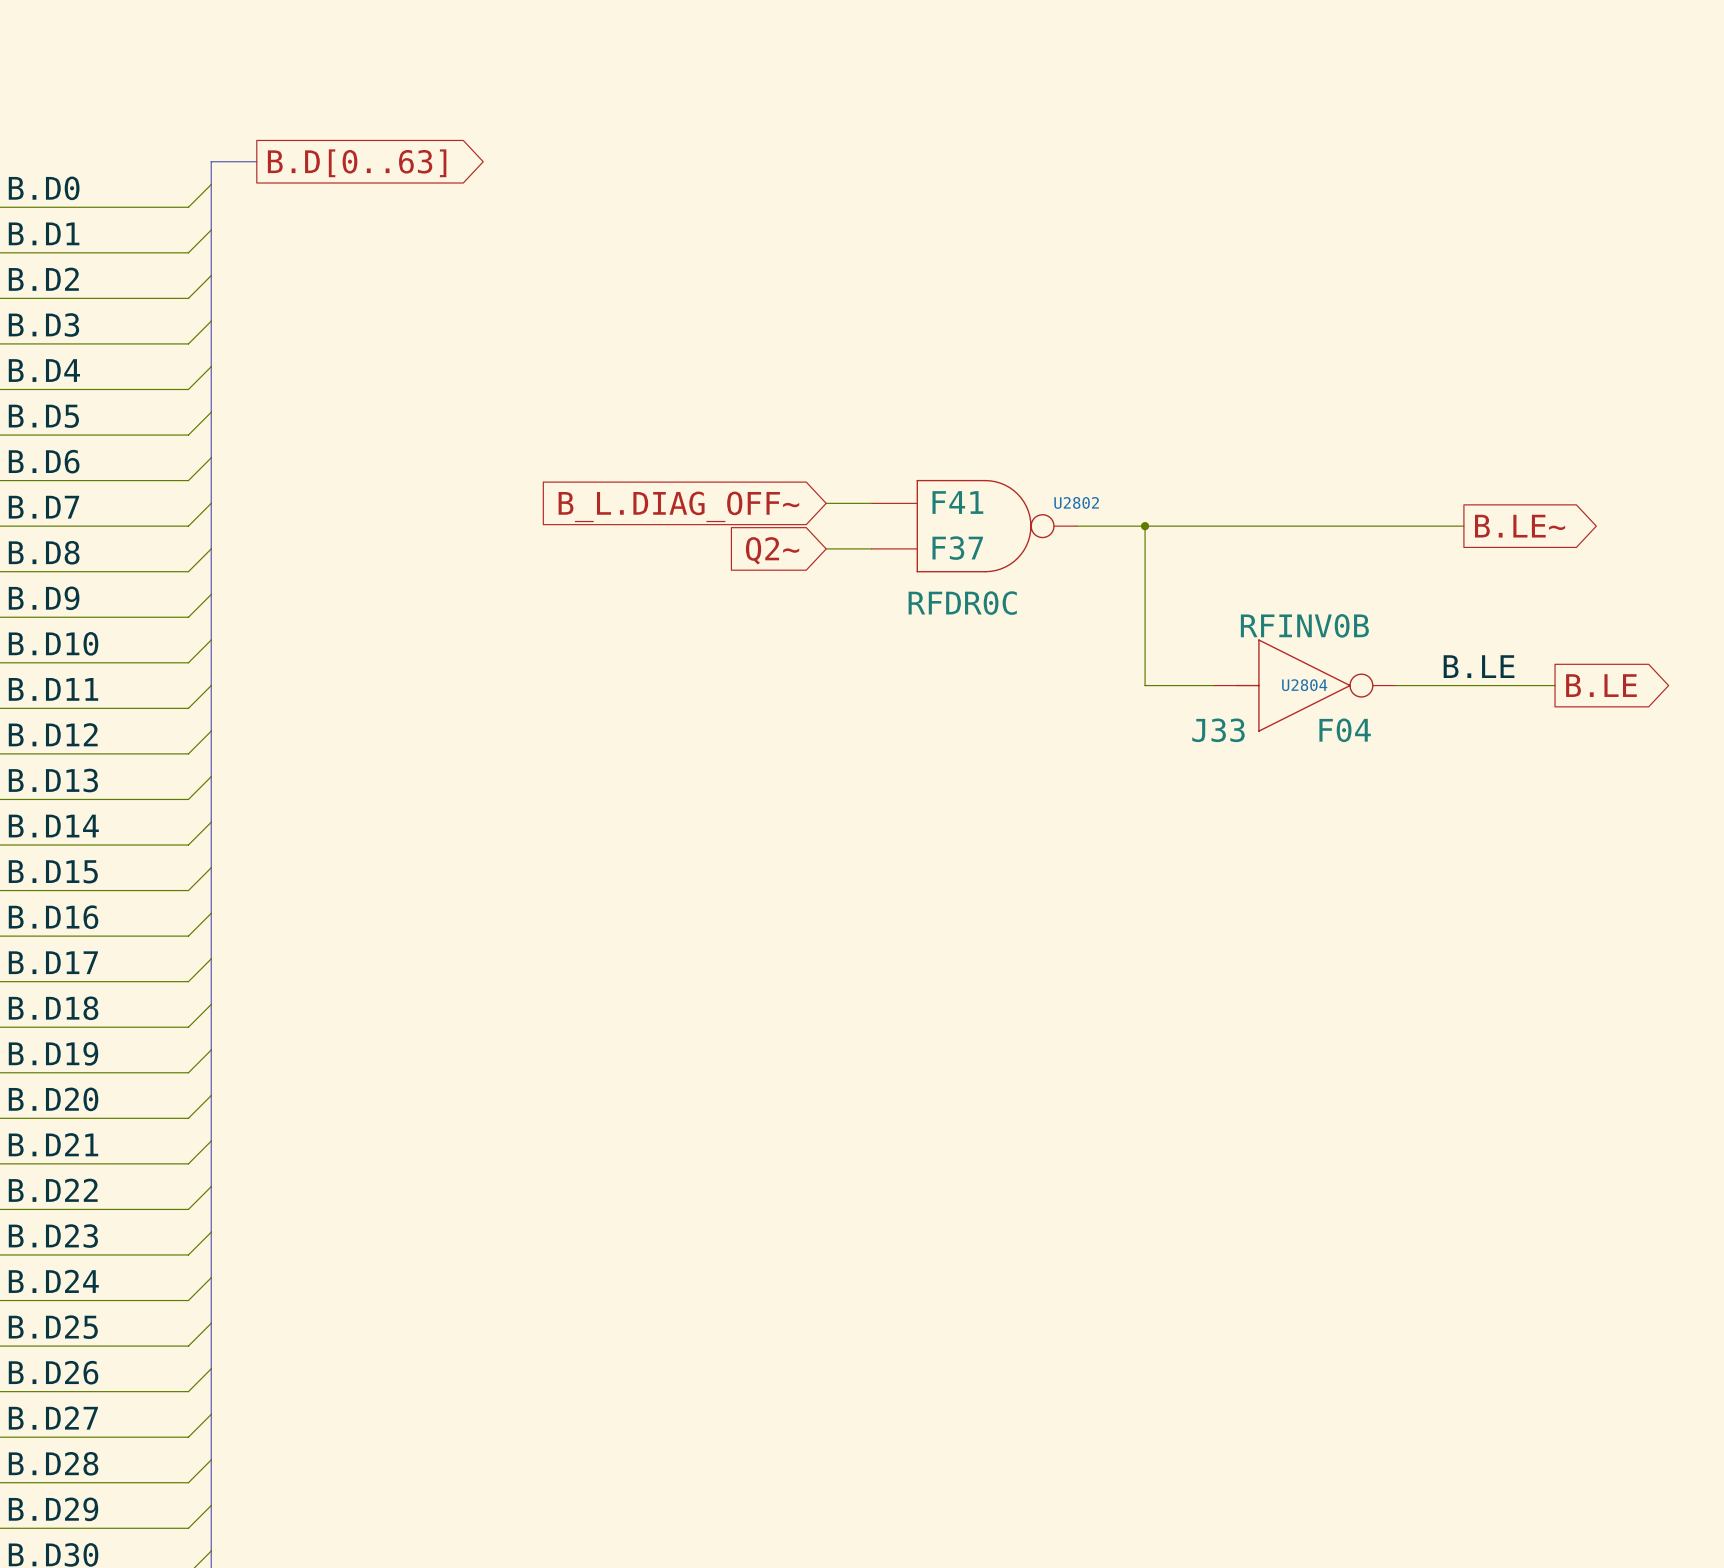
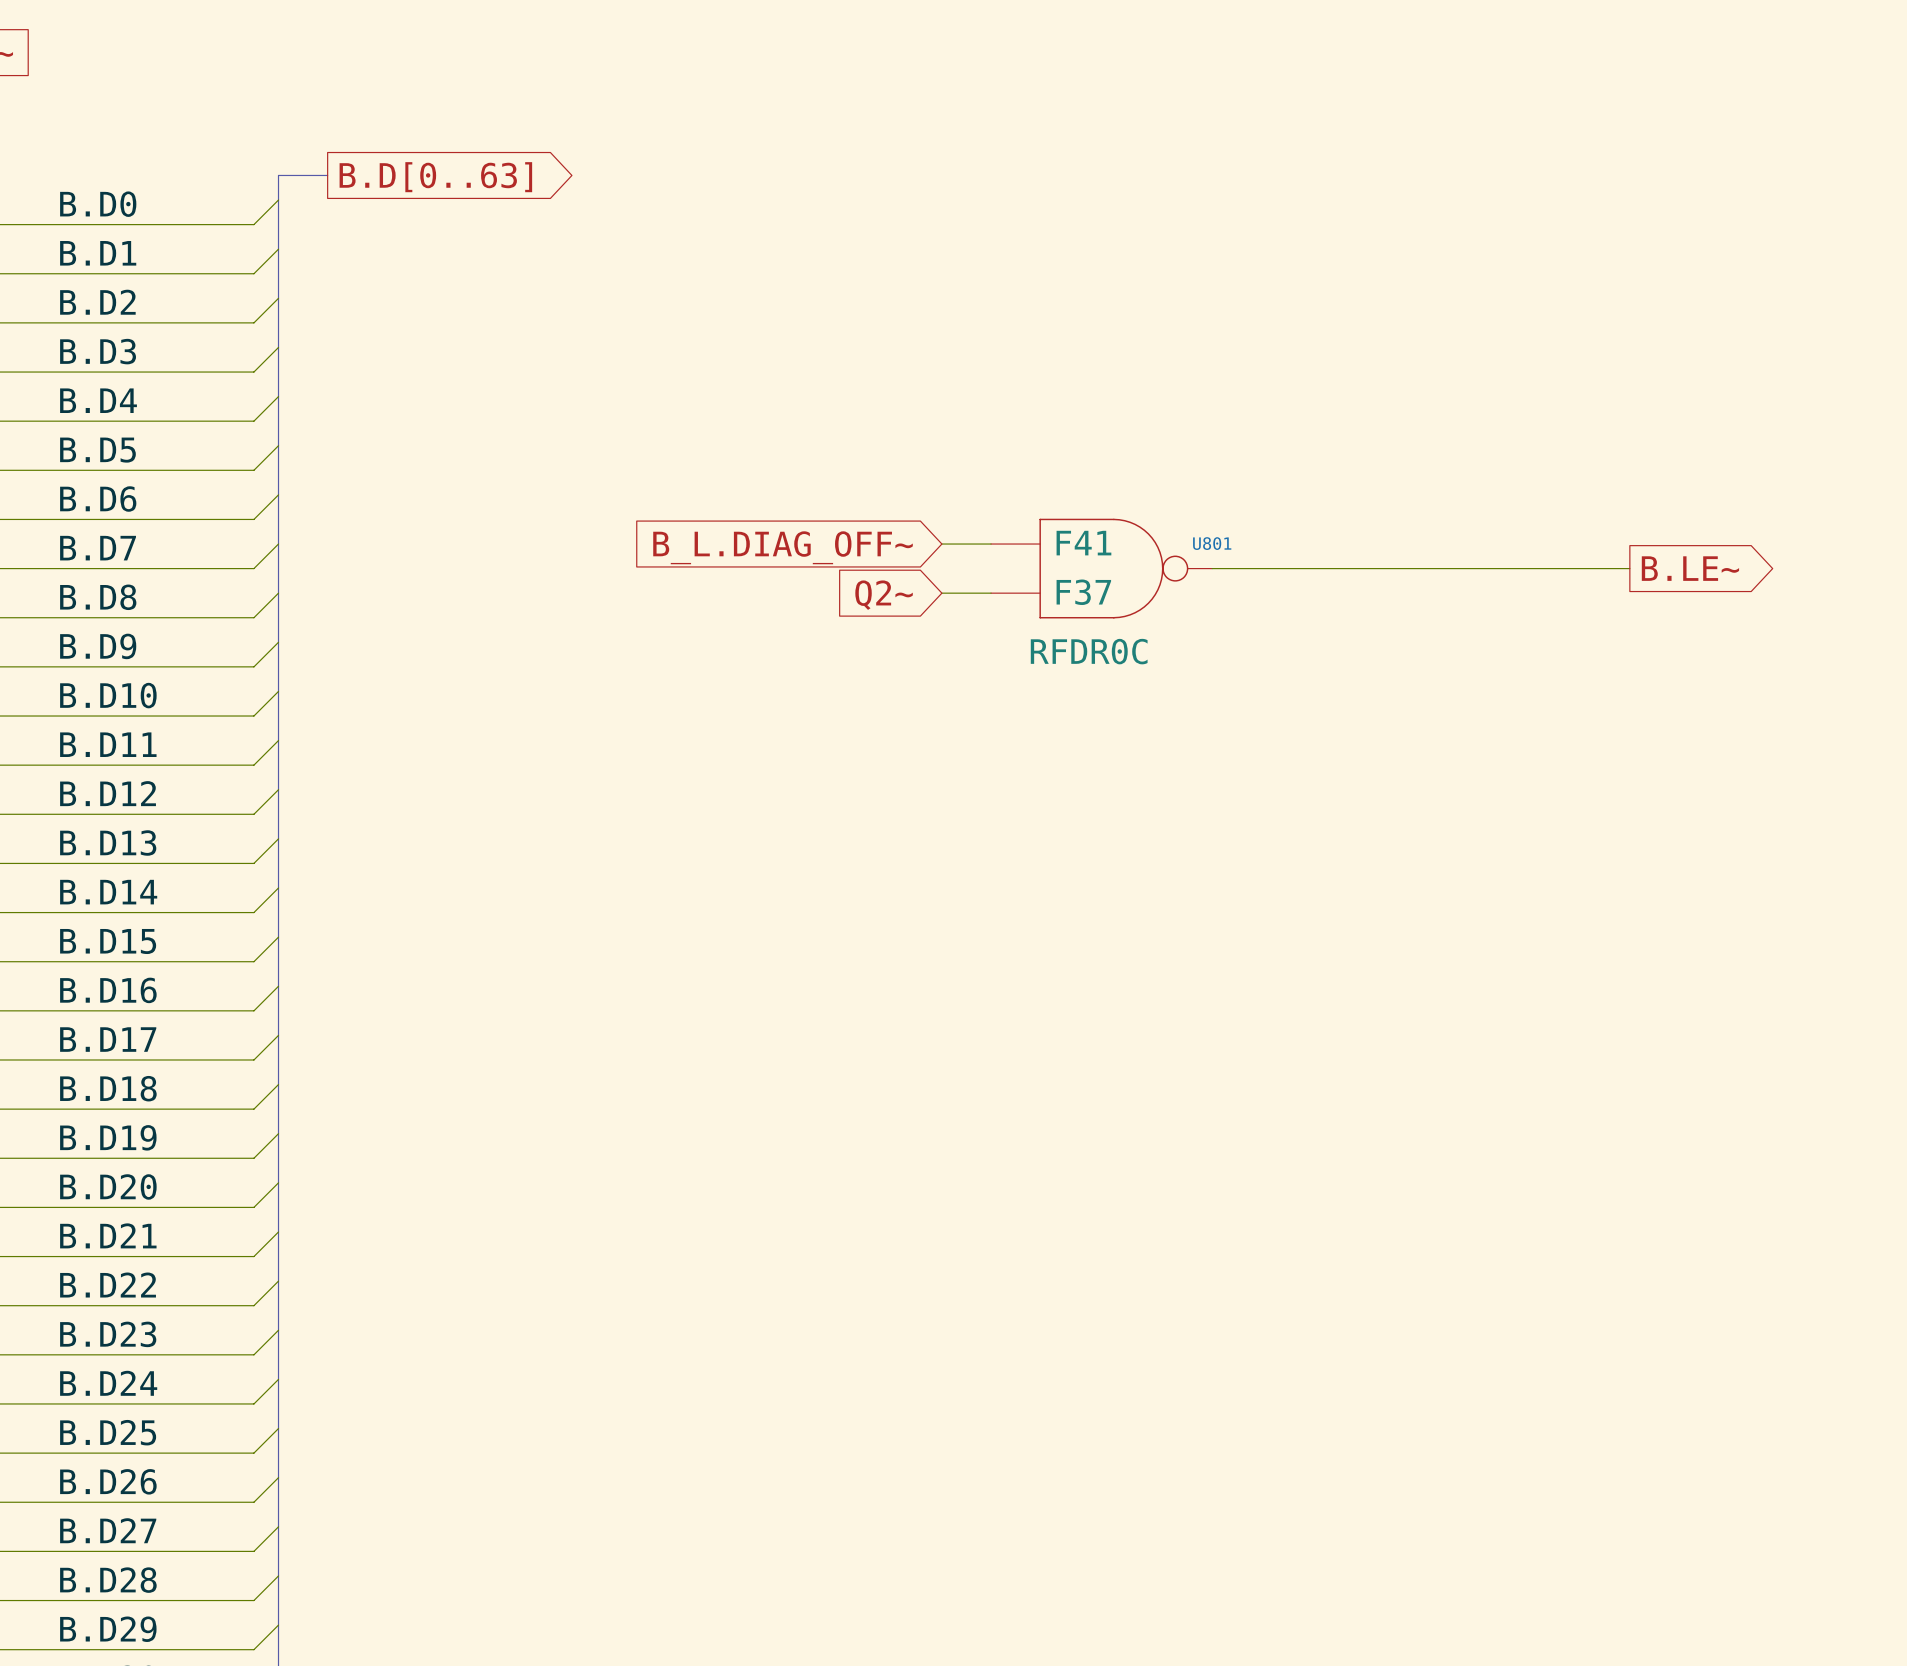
U2802 name: U2802 (1076, 502) -> U801 (1212, 543)
wire: (1145, 526) (1145, 685) (1213, 685) -> none
junction: (1145, 526) -> none
label: B.LE (1479, 666) -> none
U2804: F04 (1304, 685) -> none
wire: (1395, 685) (1555, 685) -> none
global label: B.LE (1601, 685) -> none

